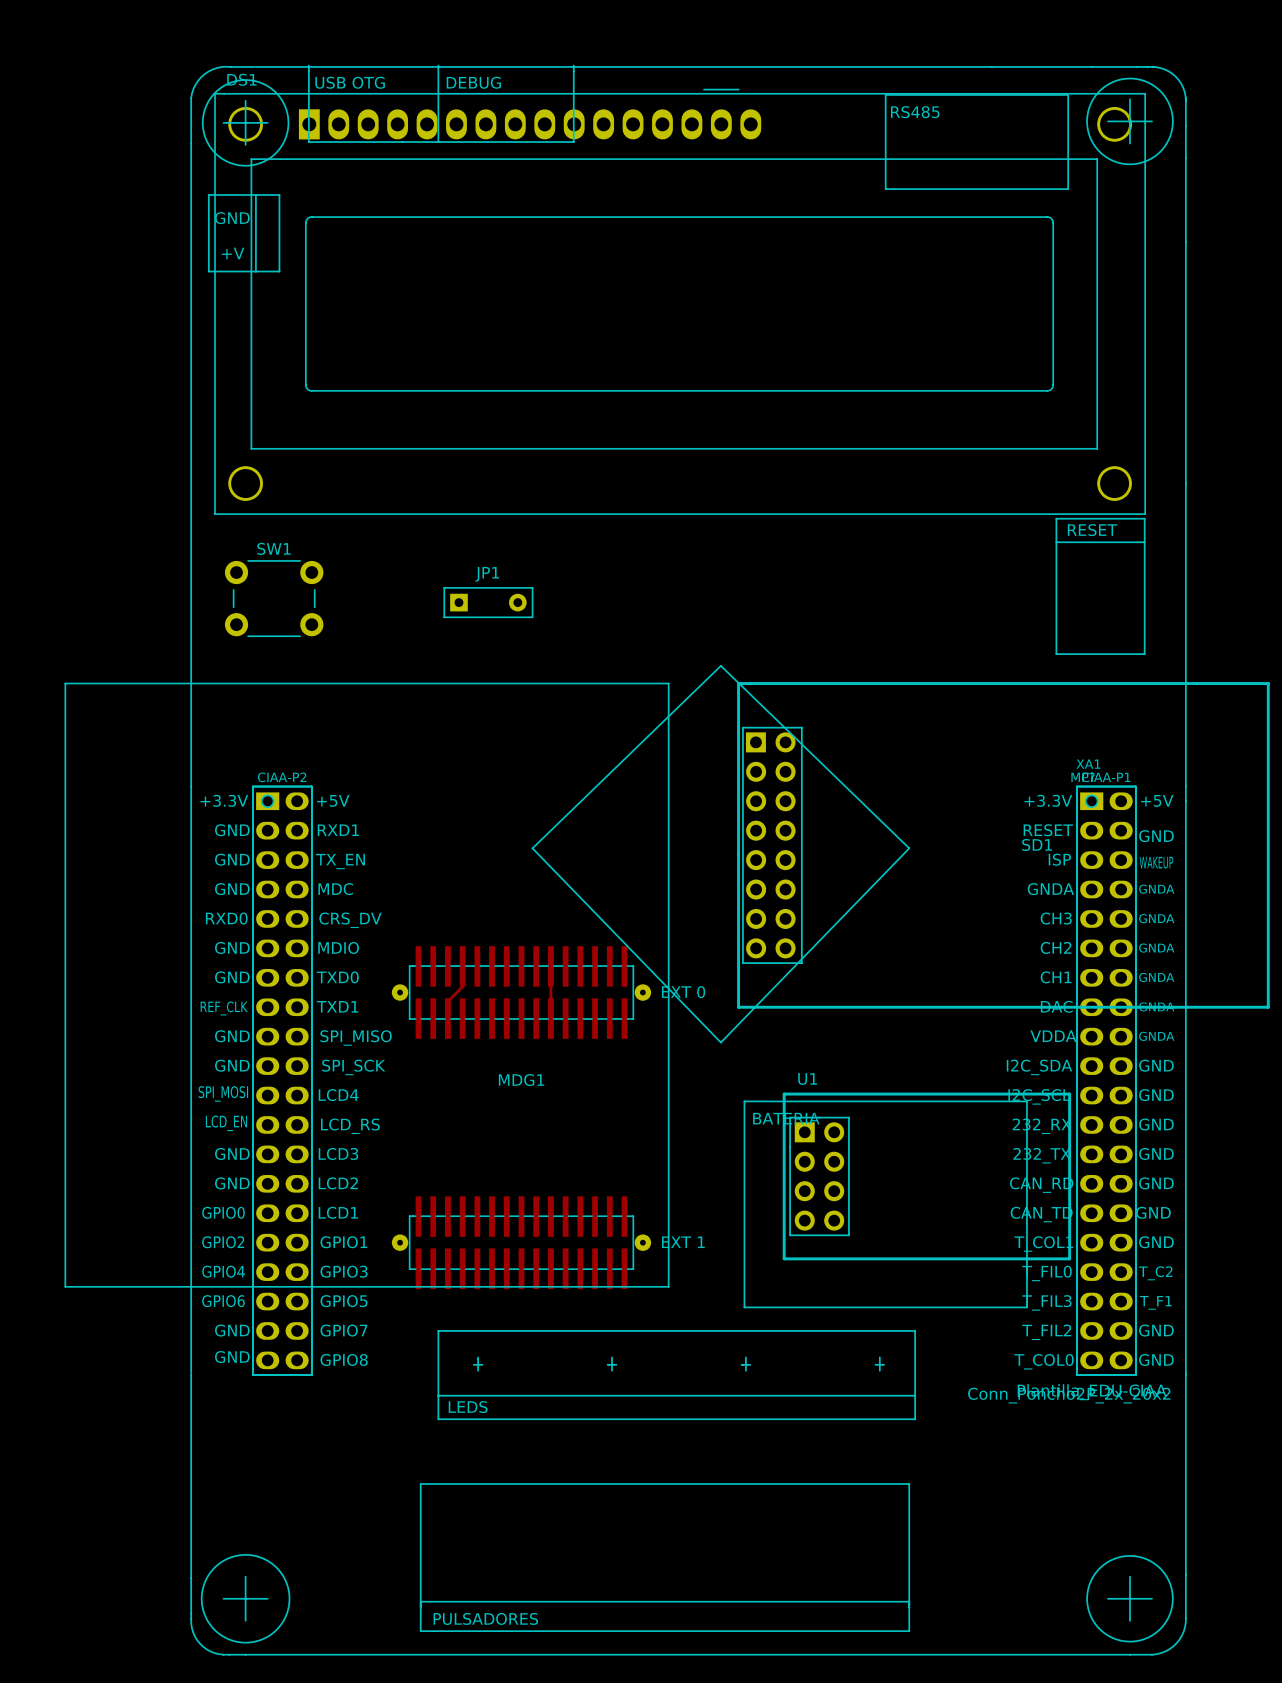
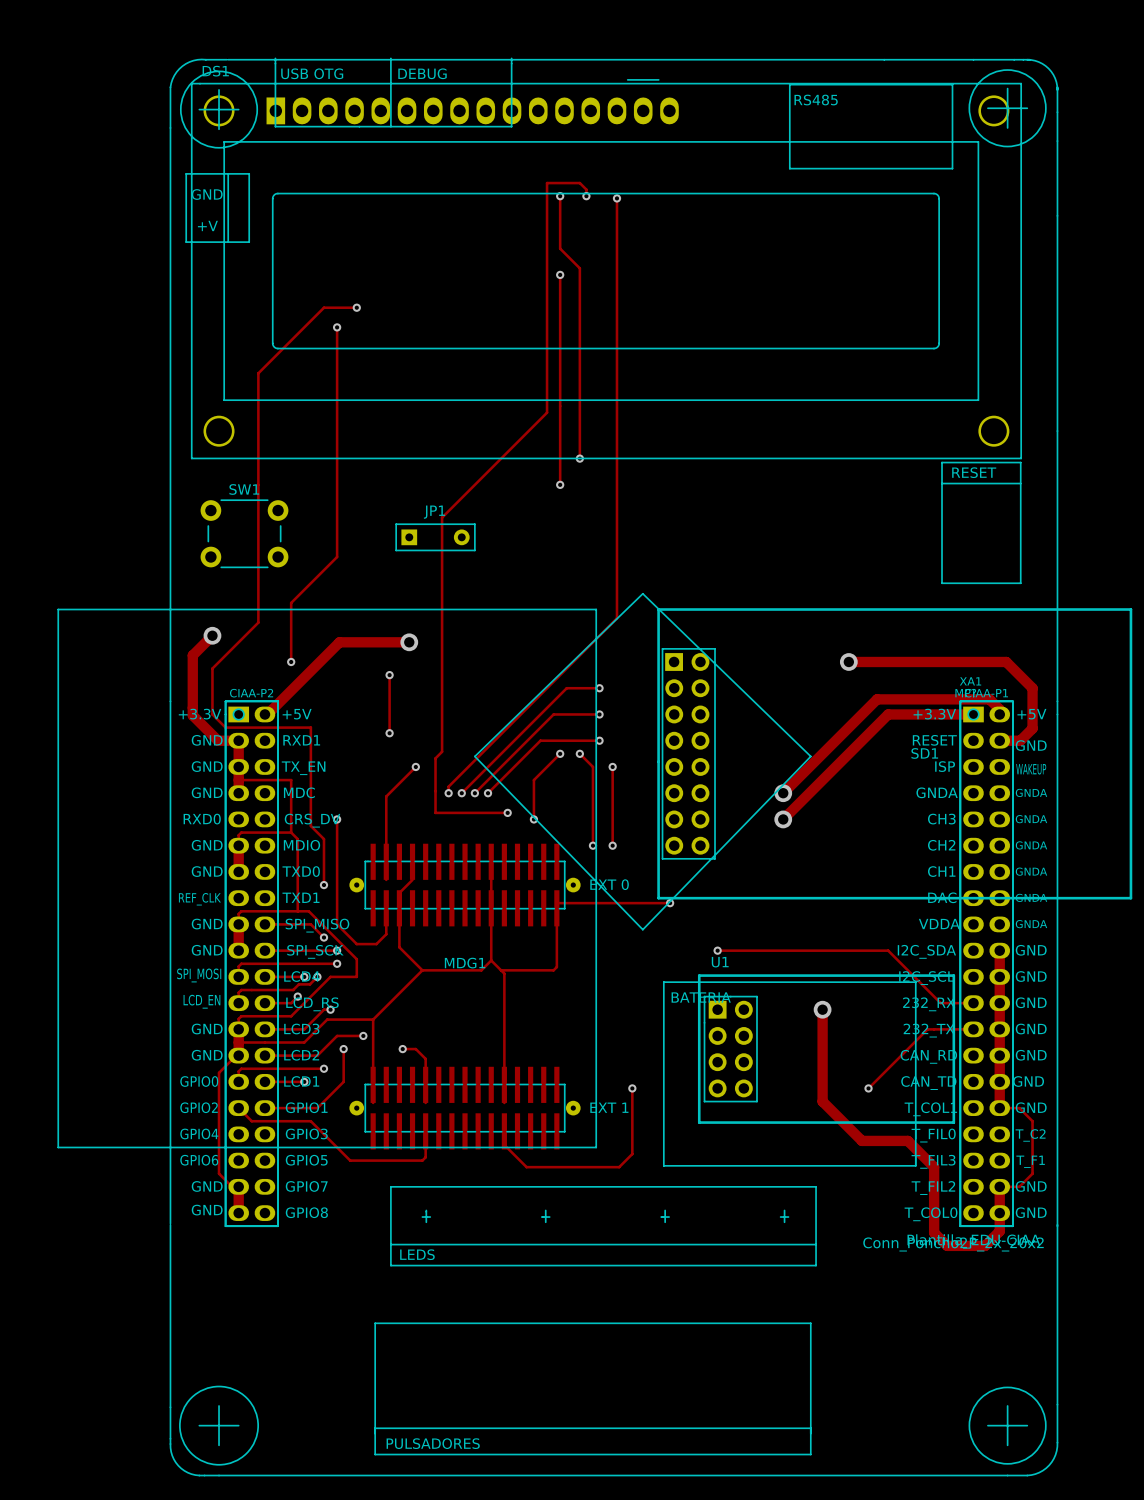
track: none -> (560, 196) (560, 248) (579, 268) (579, 458)
via: none -> (560, 196)
track: none -> (586, 196) (586, 189) (579, 183) (547, 183) (547, 412) (442, 517) (442, 751) (435, 758) (435, 812) (507, 812)
via: none -> (586, 196)
track: none -> (616, 198) (616, 618) (448, 786) (448, 793)
via: none -> (616, 198)
track: none -> (560, 274) (560, 484)
via: none -> (560, 274)
track: none -> (356, 307) (323, 307) (258, 373) (258, 622) (212, 668) (212, 714) (225, 727) (310, 727) (310, 826) (323, 839) (323, 885)
via: none -> (356, 307)
track: none -> (337, 327) (337, 557) (291, 602) (291, 661)
via: none -> (337, 327)
via: none -> (579, 458)
via: none -> (560, 484)
track: none -> (212, 635) (192, 655) (192, 715) (218, 740) (238, 740) (238, 793)
via: none -> (212, 635)
track: none -> (409, 642) (339, 642) (267, 714) (264, 714)
via: none -> (409, 642)
via: none -> (291, 661)
track: none -> (848, 661) (1006, 661) (1032, 688) (1032, 728) (1020, 740) (999, 740)
via: none -> (848, 661)
track: none -> (389, 675) (389, 733)
via: none -> (389, 675)
track: none -> (599, 688) (566, 688) (461, 793)
via: none -> (599, 688)
track: none -> (599, 714) (553, 714) (474, 793)
via: none -> (599, 714)
track: none -> (973, 714) (888, 714) (783, 819)
track: none -> (999, 714) (999, 709) (989, 699) (877, 699) (783, 793)
via: none -> (389, 733)
track: none -> (599, 740) (540, 740) (488, 793)
via: none -> (599, 740)
track: none -> (560, 753) (533, 780) (533, 819)
via: none -> (560, 753)
track: none -> (579, 753) (592, 766) (592, 845)
via: none -> (579, 753)
track: none -> (415, 766) (386, 796) (386, 879)
via: none -> (415, 766)
track: none -> (612, 766) (612, 845)
via: none -> (612, 766)
track: none -> (238, 780) (291, 780) (291, 832)
via: none -> (448, 793)
via: none -> (461, 793)
via: none -> (474, 793)
via: none -> (488, 793)
via: none -> (783, 793)
via: none -> (507, 812)
track: none -> (337, 819) (337, 924) (356, 944) (376, 944) (386, 934) (386, 903)
via: none -> (337, 819)
via: none -> (533, 819)
via: none -> (783, 819)
track: none -> (291, 832) (241, 832) (238, 835) (238, 871)
track: none -> (291, 832) (297, 839) (297, 911)
via: none -> (592, 845)
via: none -> (612, 845)
via: none -> (323, 885)
track: none -> (399, 903) (399, 947) (422, 970)
track: none -> (491, 903) (491, 960)
track: none -> (670, 903) (556, 903) (556, 967) (553, 970) (501, 970)
via: none -> (670, 903)
track: none -> (264, 924) (310, 924) (323, 937)
via: none -> (323, 937)
track: none -> (238, 950) (238, 913) (241, 911) (308, 911) (356, 959) (356, 976) (330, 976) (291, 1016) (241, 1016) (238, 1018) (238, 1055) (236, 1055) (219, 1072) (219, 1173) (232, 1186) (238, 1186) (238, 1213)
track: none -> (264, 950) (337, 950)
via: none -> (337, 950)
track: none -> (717, 950) (888, 950) (940, 1003) (973, 1003)
via: none -> (717, 950)
track: none -> (999, 950) (999, 1108) (1019, 1108) (1032, 1121) (1032, 1173) (1019, 1186) (999, 1186) (999, 1231) (985, 1245) (947, 1245) (934, 1232) (934, 1167) (907, 1140) (861, 1140) (822, 1101) (822, 1009)
track: none -> (491, 960) (481, 970) (422, 970)
track: none -> (491, 960) (504, 973) (504, 1102)
track: none -> (337, 963) (241, 963) (238, 966) (238, 976)
via: none -> (337, 963)
track: none -> (422, 970) (373, 1019)
track: none -> (264, 976) (304, 976)
via: none -> (304, 976)
track: none -> (317, 976) (309, 984) (298, 984) (293, 990) (241, 990) (238, 992) (238, 1003)
via: none -> (317, 976)
track: none -> (297, 996) (291, 1003) (264, 1003)
via: none -> (297, 996)
track: none -> (330, 1009) (323, 1009) (304, 1029) (264, 1029)
via: none -> (330, 1009)
via: none -> (822, 1009)
track: none -> (373, 1019) (373, 1102)
track: none -> (373, 1019) (327, 1019) (304, 1042) (238, 1042)
track: none -> (973, 1029) (927, 1029) (868, 1088)
track: none -> (363, 1035) (337, 1035) (317, 1055) (264, 1055)
via: none -> (363, 1035)
track: none -> (343, 1049) (343, 1081) (317, 1108) (264, 1108)
via: none -> (343, 1049)
track: none -> (402, 1049) (415, 1049) (425, 1058) (425, 1102)
via: none -> (402, 1049)
track: none -> (323, 1068) (241, 1068) (238, 1071) (238, 1081)
via: none -> (323, 1068)
track: none -> (264, 1081) (304, 1081)
via: none -> (304, 1081)
track: none -> (632, 1088) (632, 1154) (619, 1167) (526, 1167) (504, 1144) (504, 1126)
via: none -> (632, 1088)
via: none -> (868, 1088)
track: none -> (238, 1108) (251, 1121) (310, 1121) (350, 1160) (422, 1160) (425, 1157) (425, 1126)

